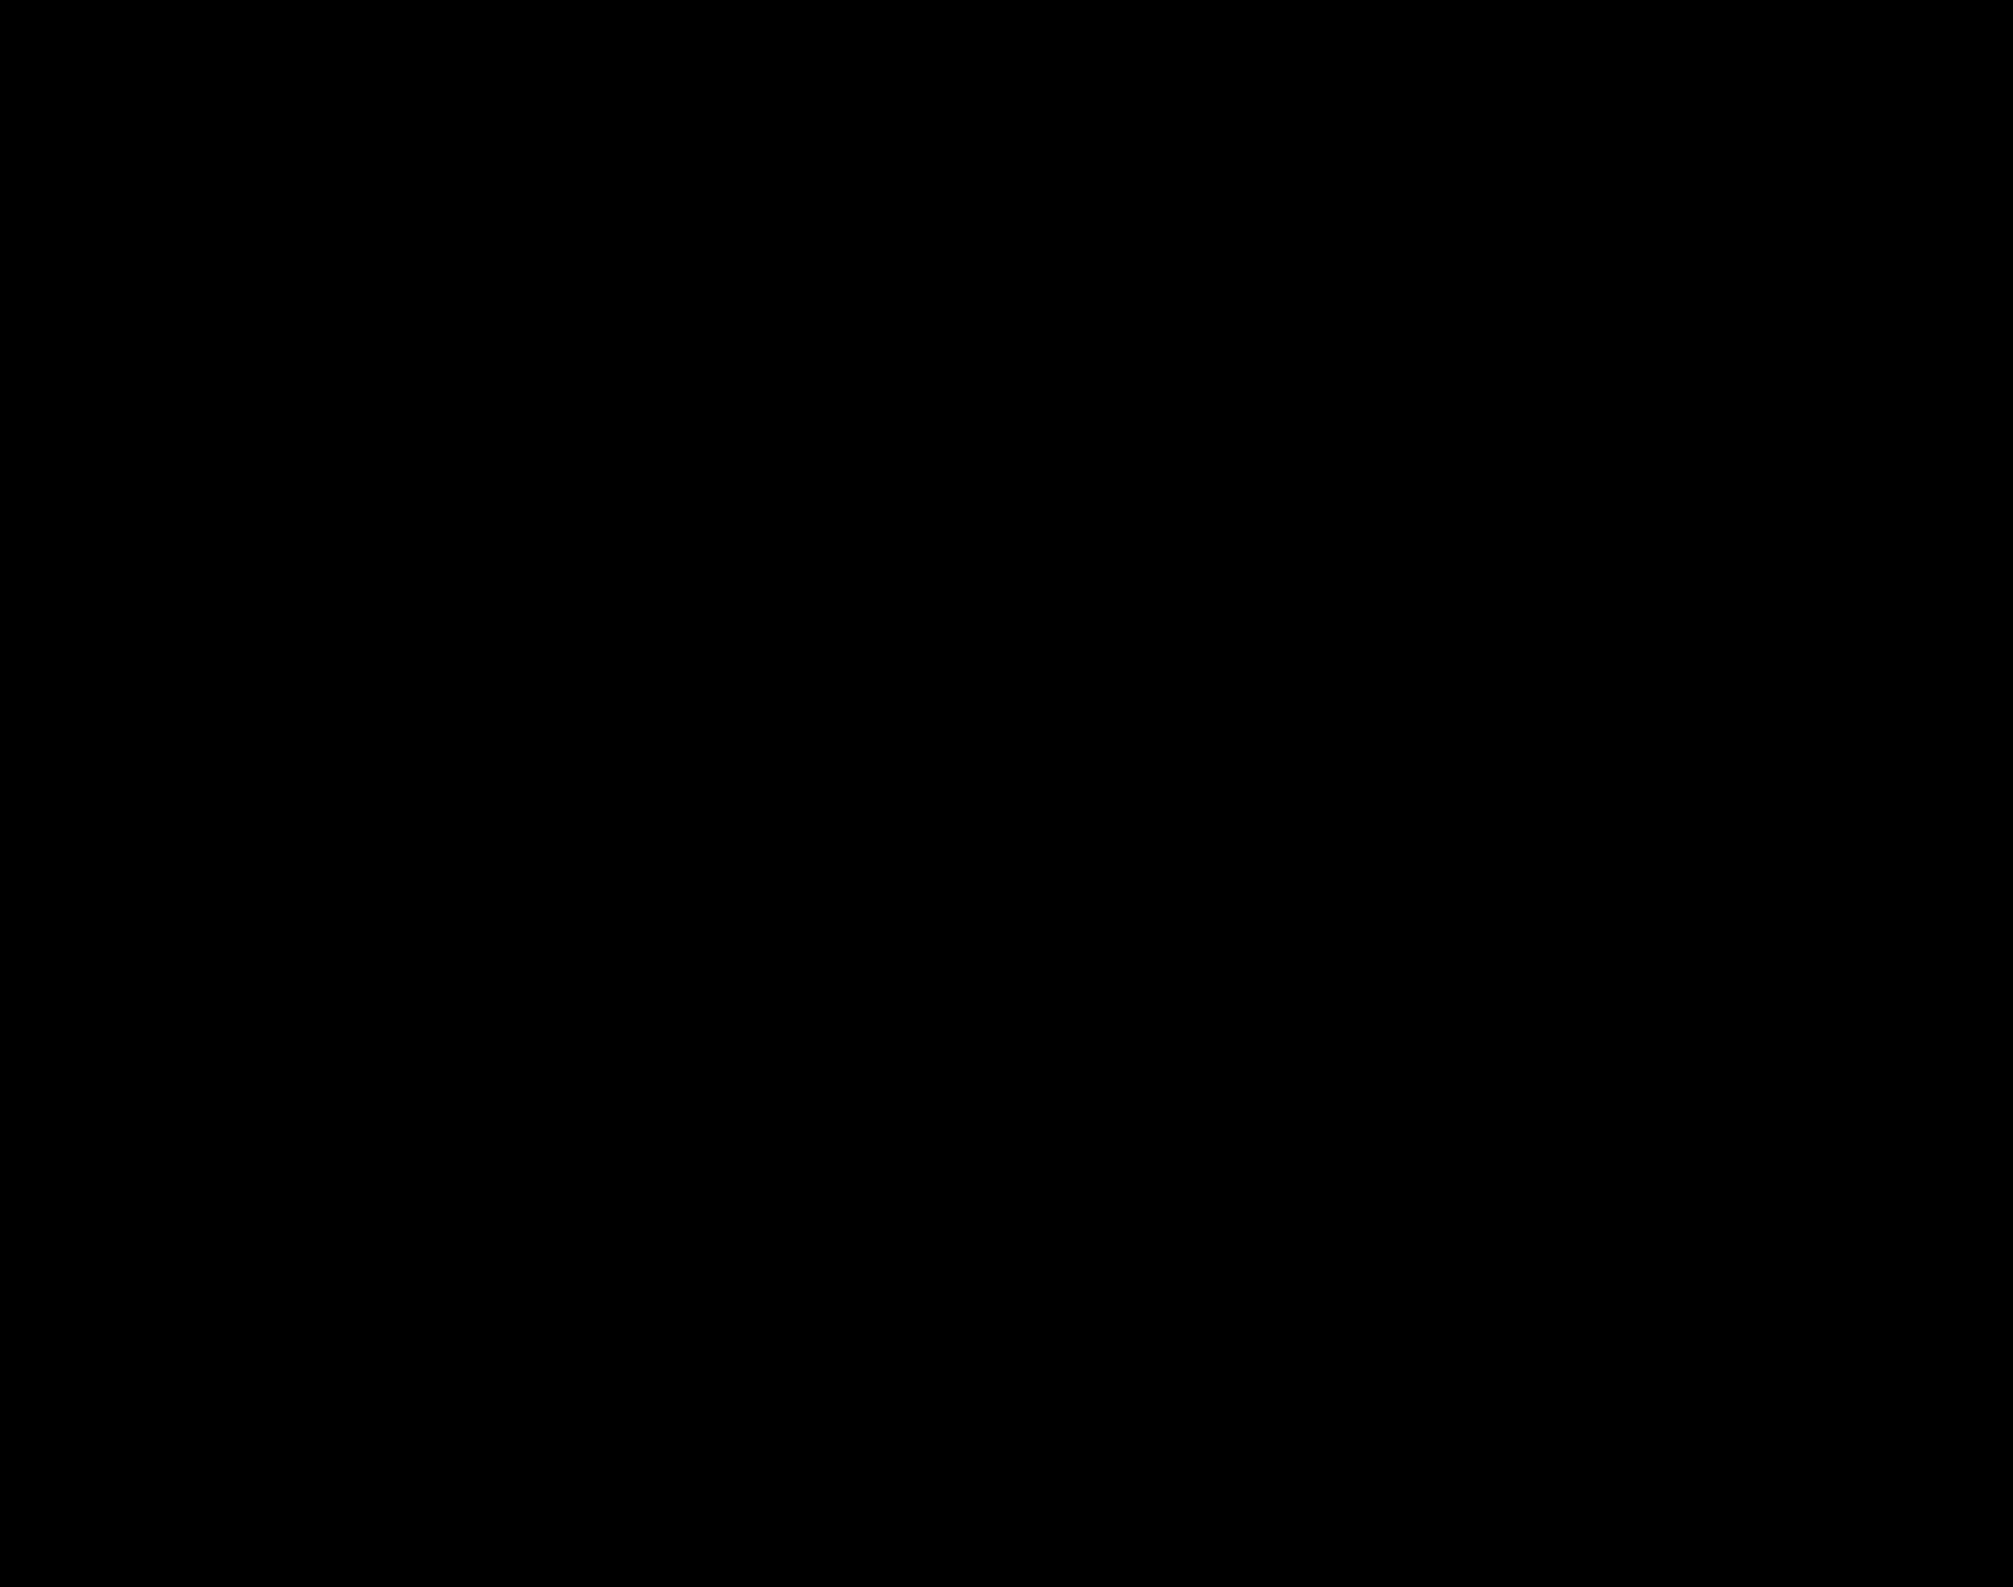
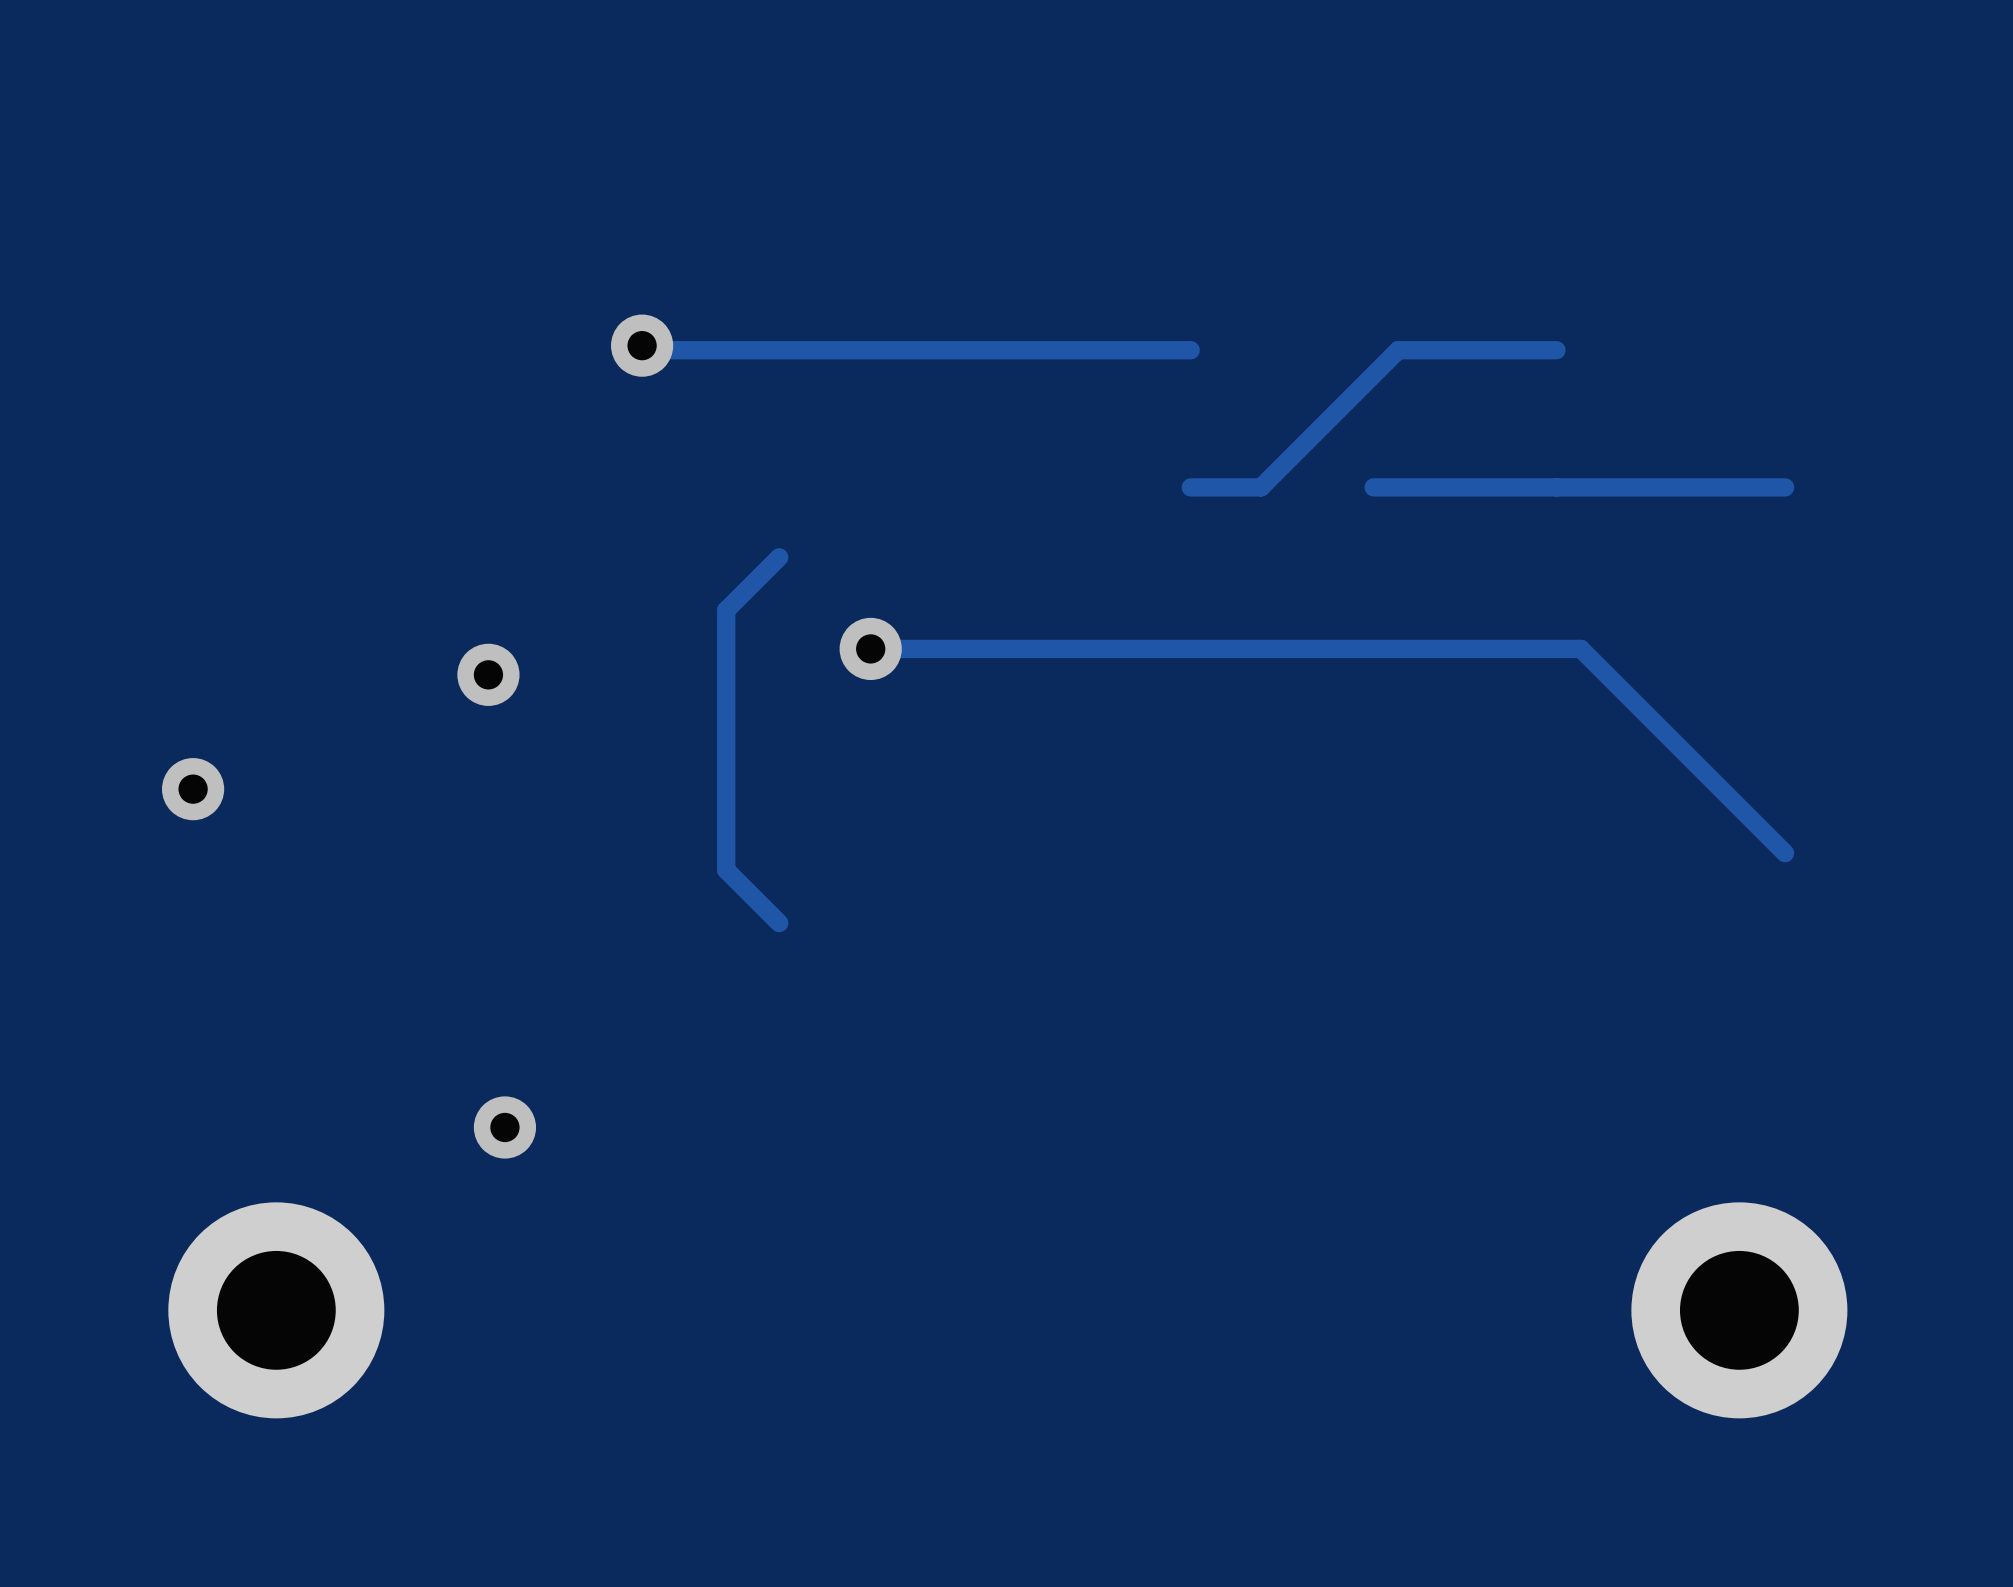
track: none -> (642, 345) (646, 350) (1190, 350)
via: none -> (642, 345)
track: none -> (1556, 350) (1398, 350) (1261, 487) (1190, 487)
track: none -> (1373, 487) (1785, 487)
track: none -> (779, 557) (726, 610) (726, 870) (779, 923)
track: none -> (870, 648) (1580, 648) (1785, 853)
via: none -> (870, 648)
via: none -> (488, 674)
via: none -> (193, 789)
via: none -> (504, 1127)
part: none -> (276, 1310)
part: none -> (1739, 1310)

